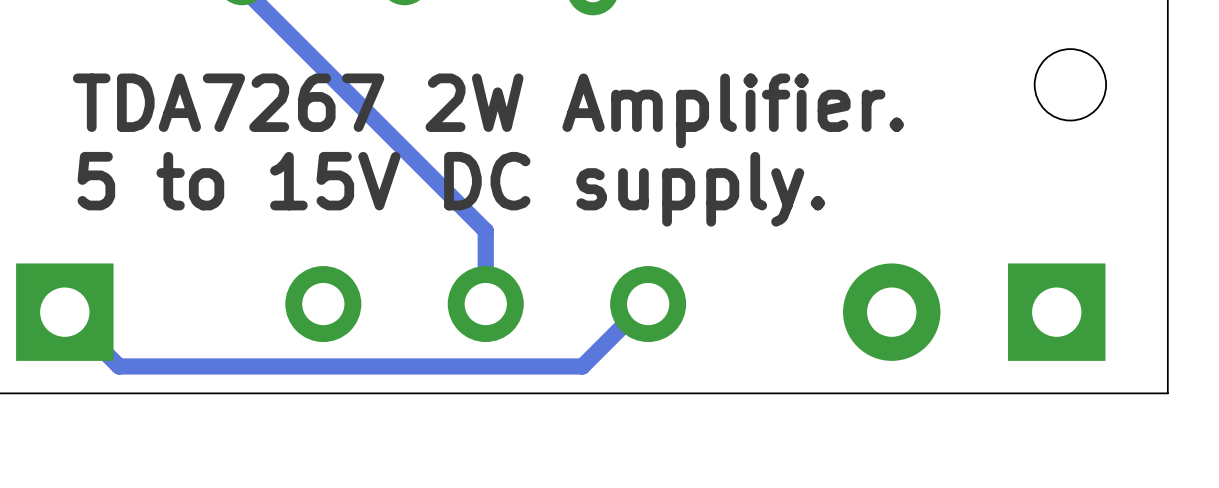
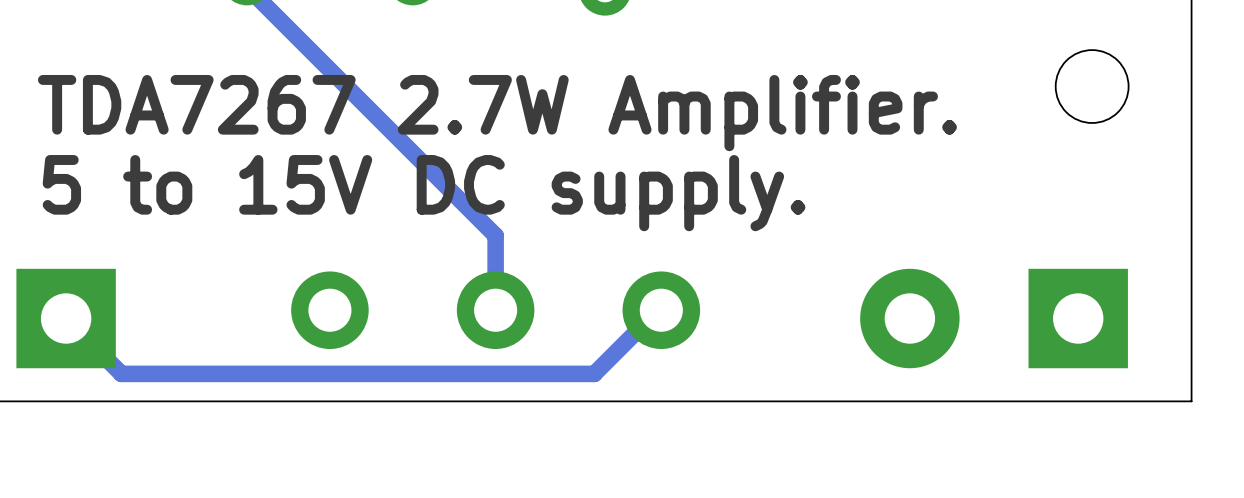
text: TDA7267 2W Amplifier. (488, 110) -> TDA7267 2.7W Amplifier. (497, 113)
text position: 5 to 15V DC supply. (451, 189) -> 5 to 15V DC supply. (424, 193)

